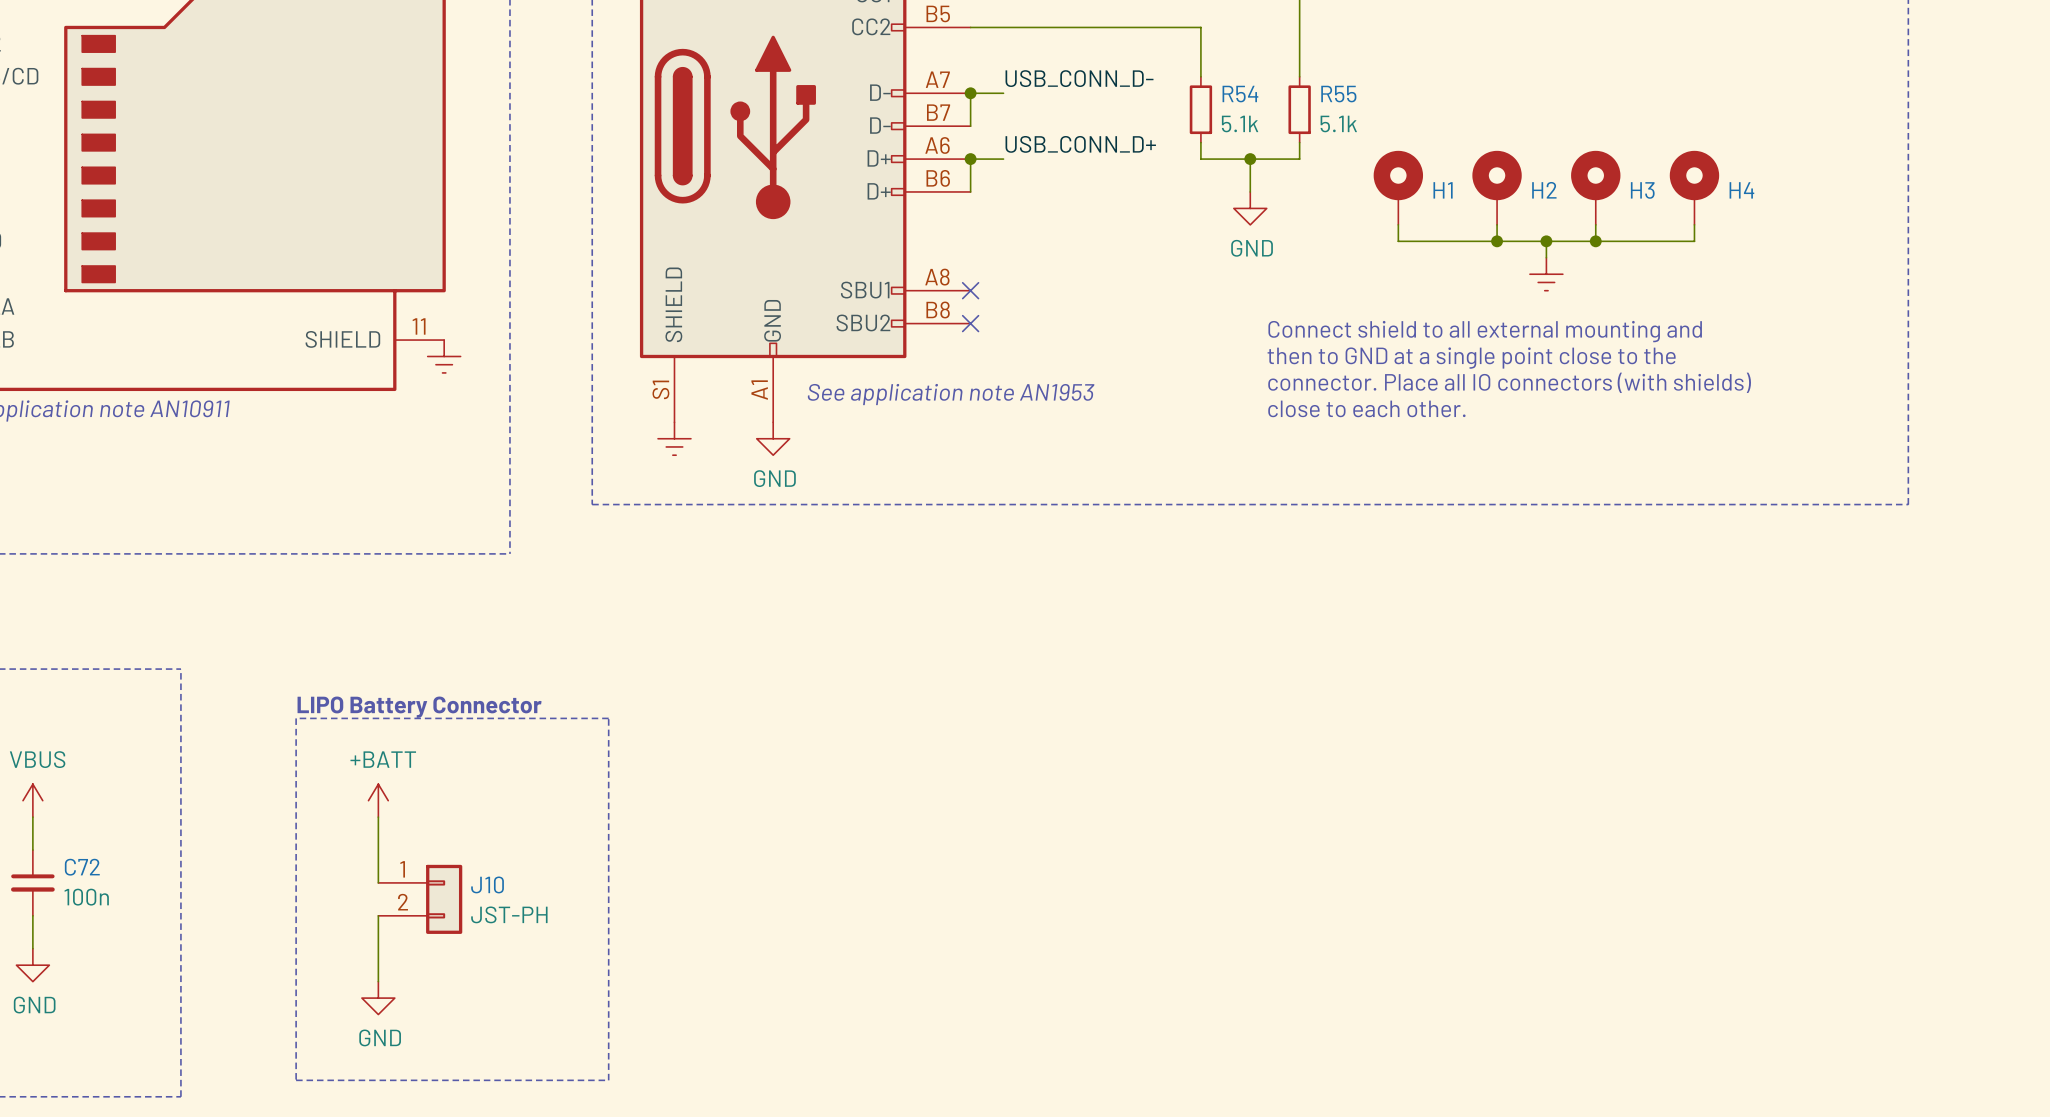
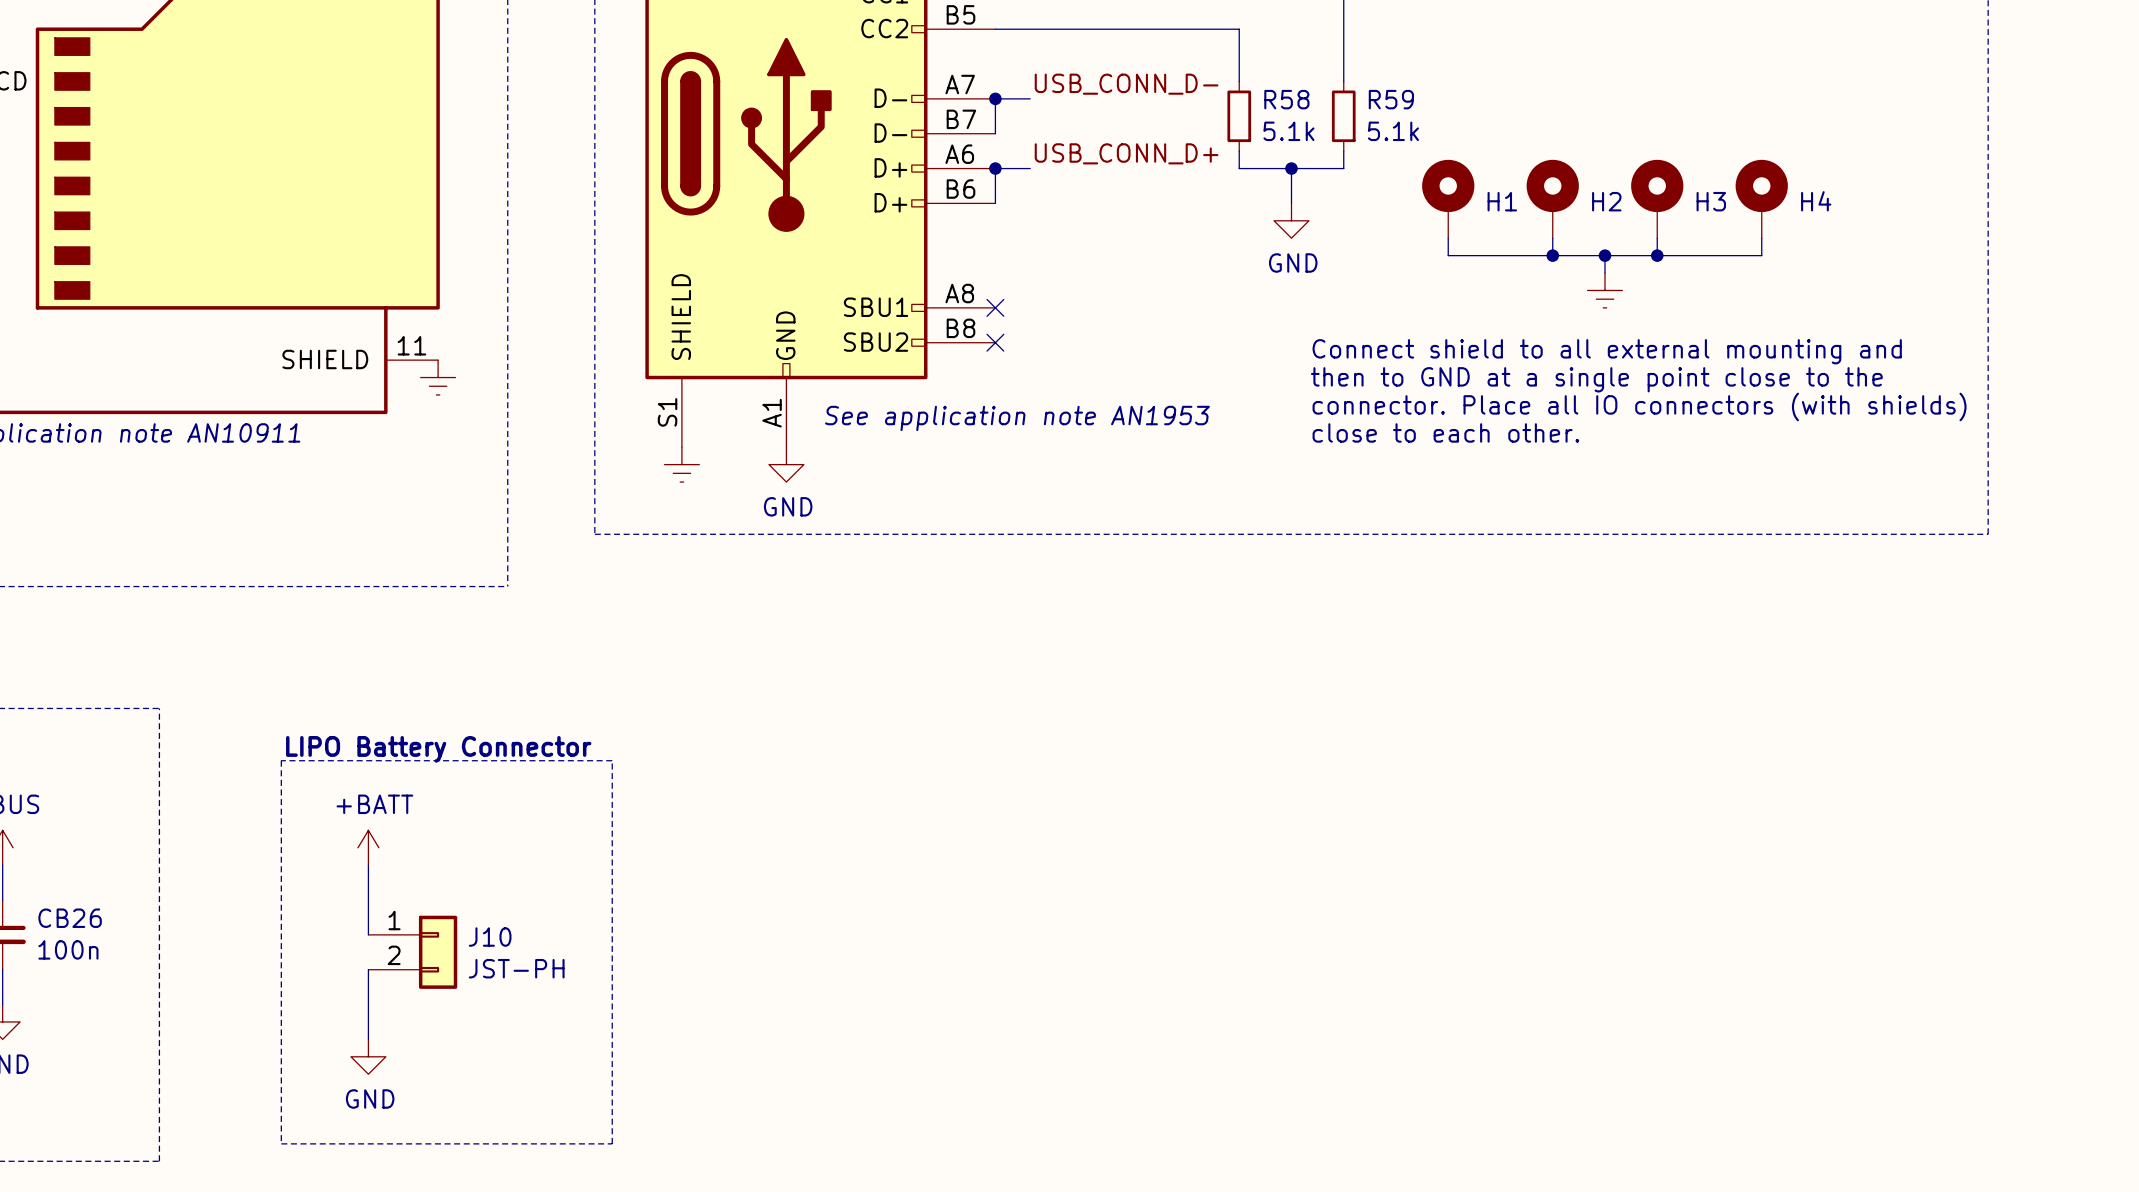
R54 name: R54 (1240, 94) -> R58 (1286, 99)
R55 name: R55 (1338, 94) -> R59 (1391, 99)
C72 name: C72 (82, 867) -> CB26 (70, 918)

